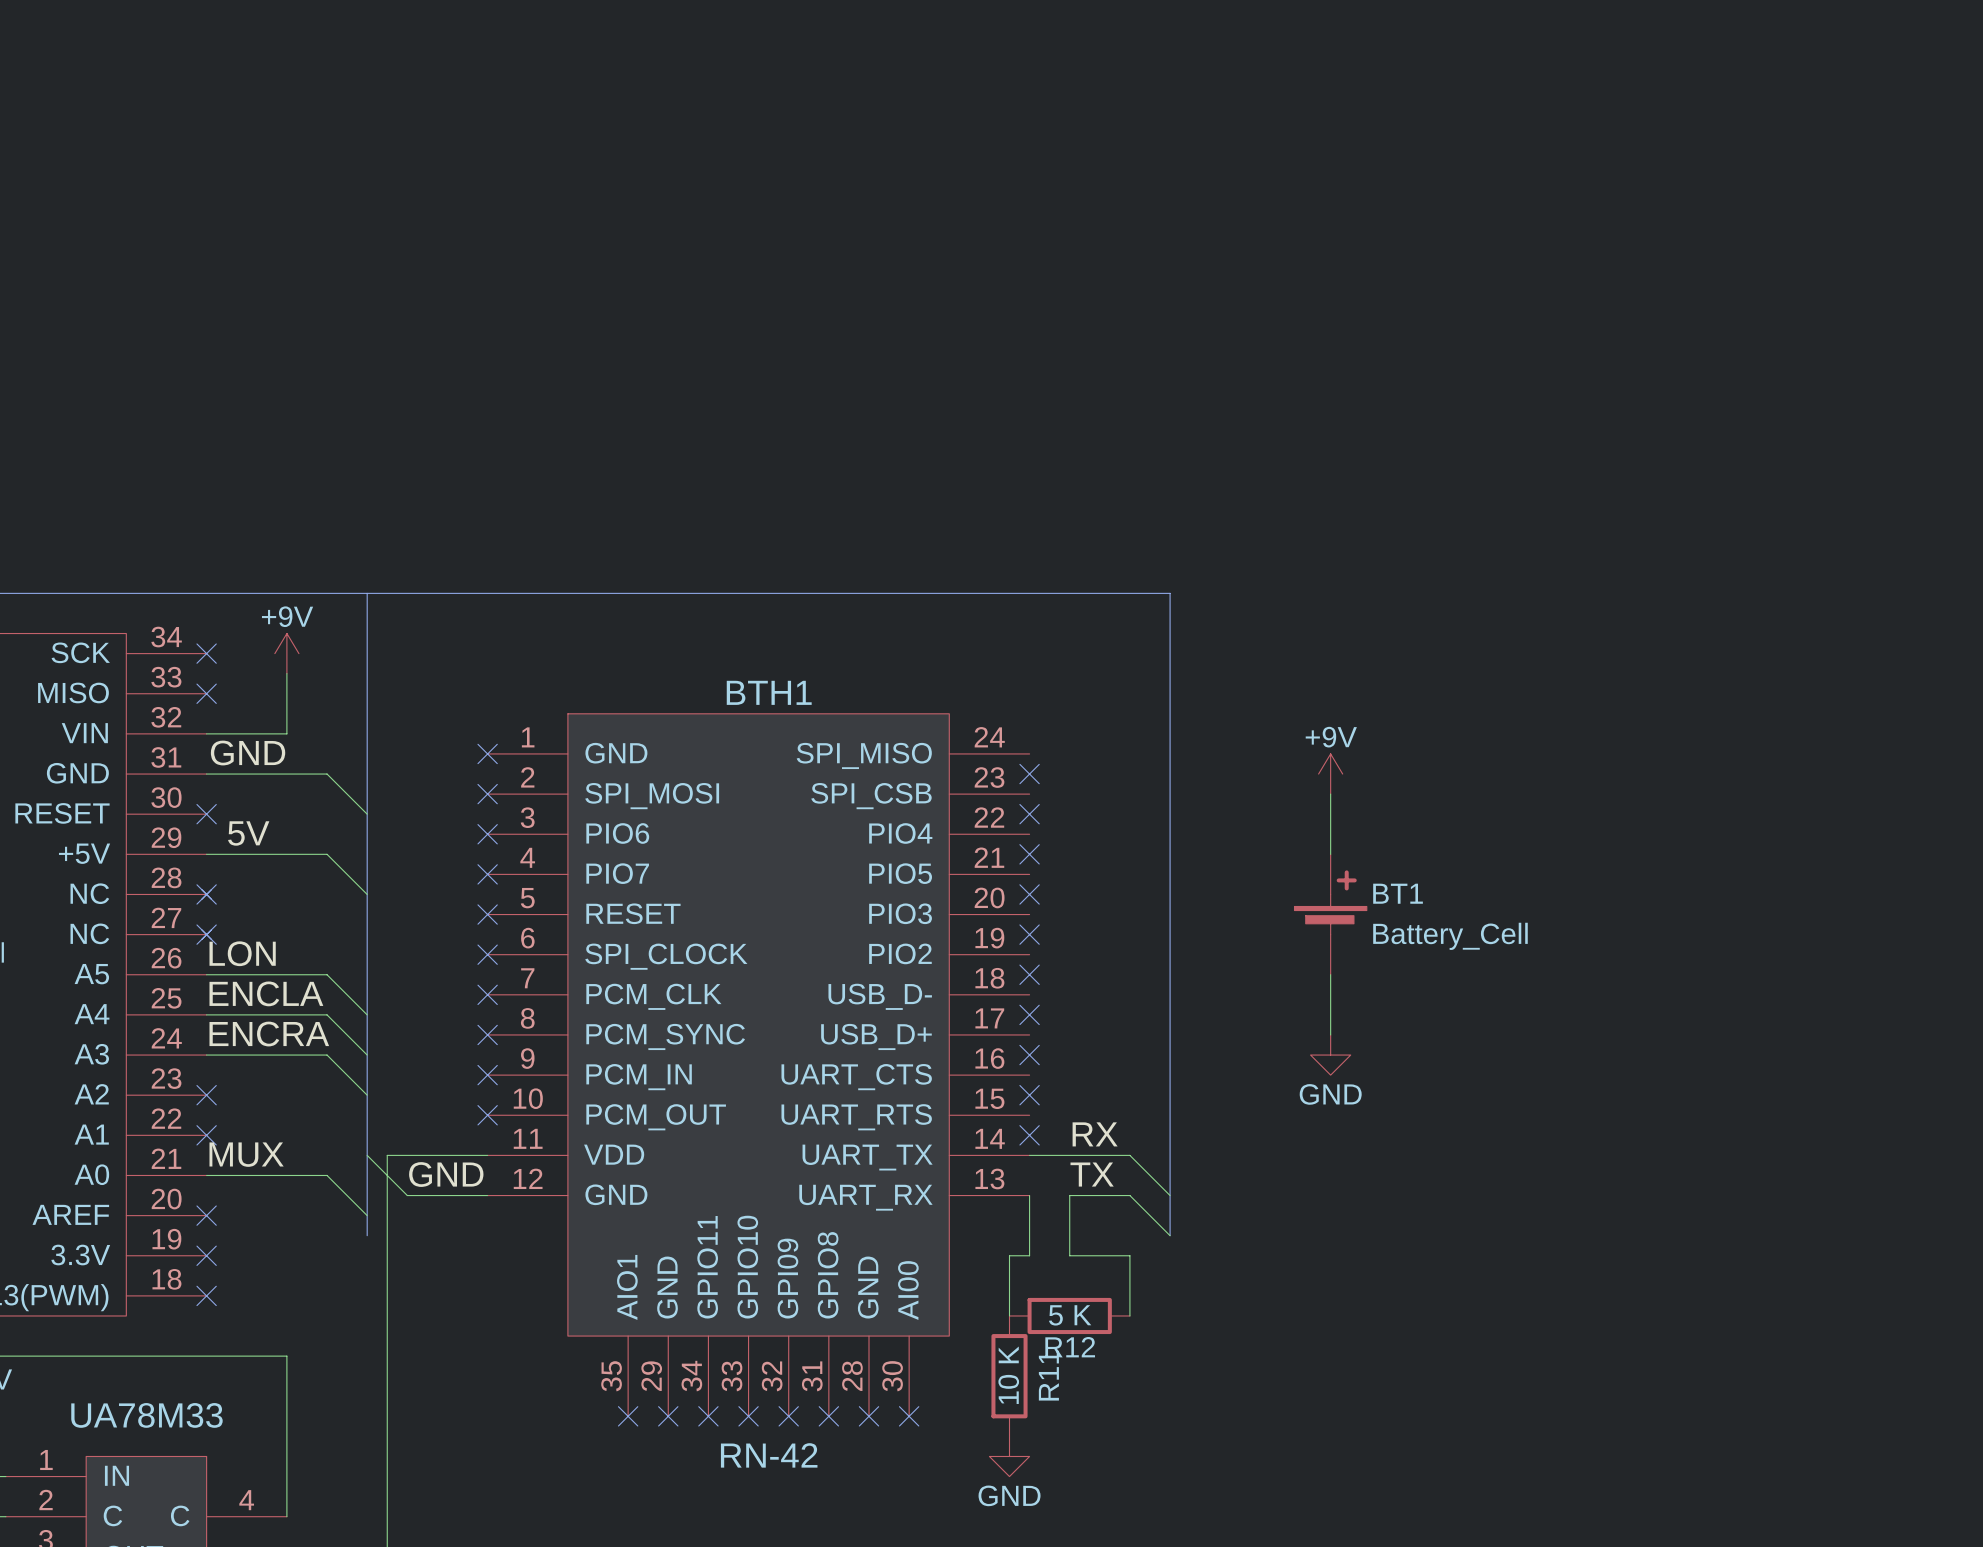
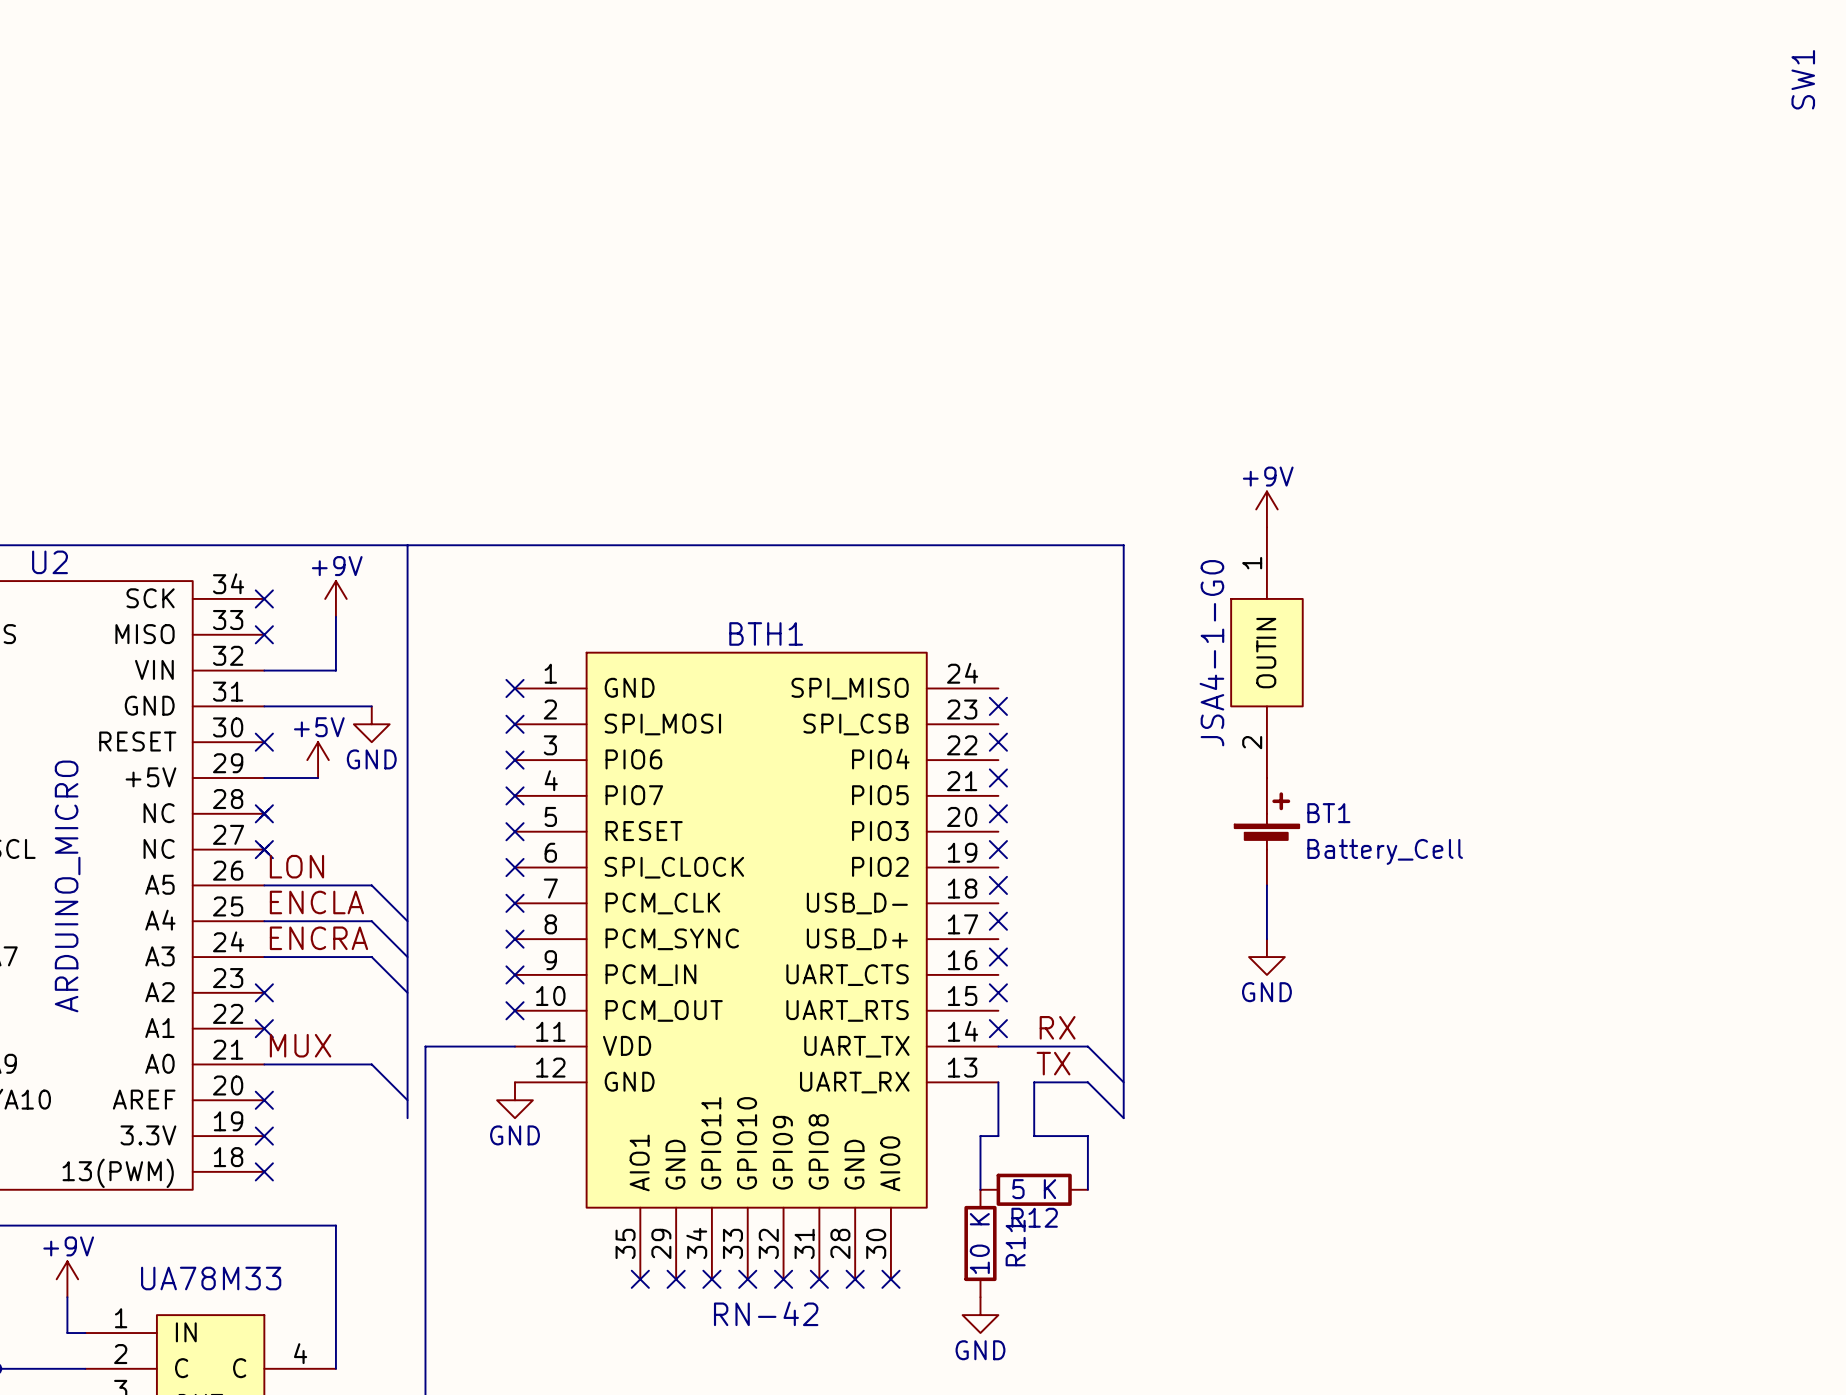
SW1: none -> JSA4-1-G0 (1266, 652)
label: GND (248, 753) -> none
wire: (327, 774) (367, 814) -> none
power symbol position: +9V (1330, 774) -> +9V (1266, 509)
power symbol: none -> GND (371, 724)
label: 5V (248, 833) -> none
power symbol: none -> +5V (318, 760)
wire: (266, 854) (327, 854) (367, 894) -> none
wire: (367, 1155) (407, 1195) (487, 1195) -> none
label: GND (446, 1174) -> none
power symbol: none -> GND (514, 1100)

